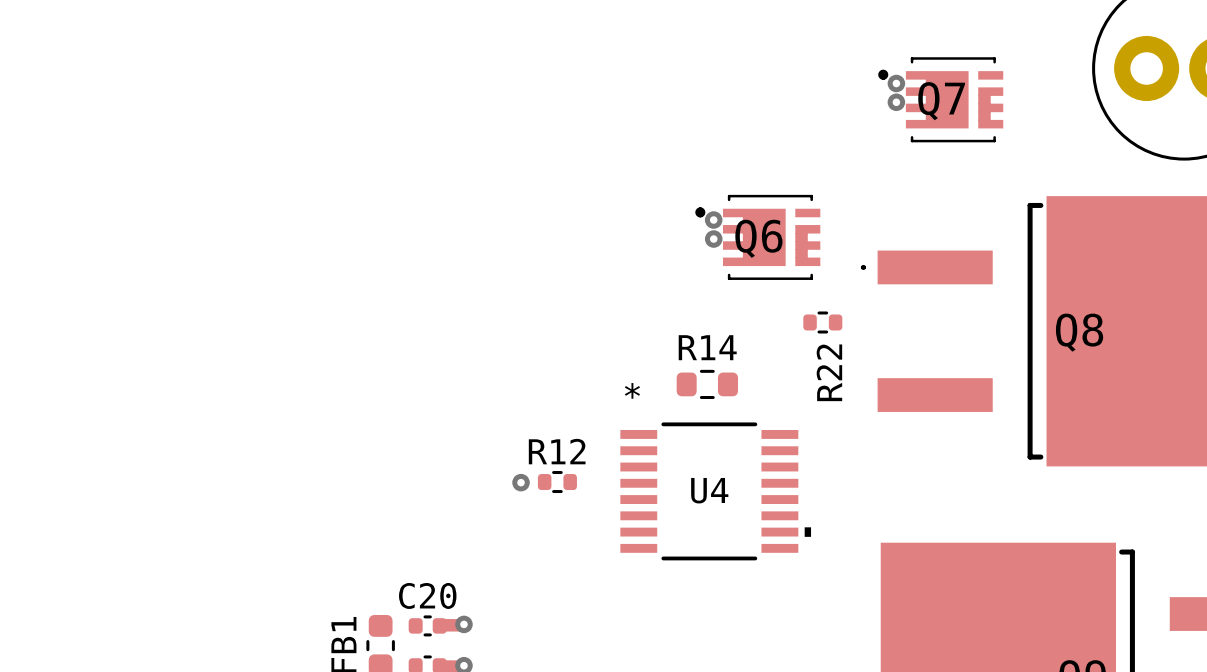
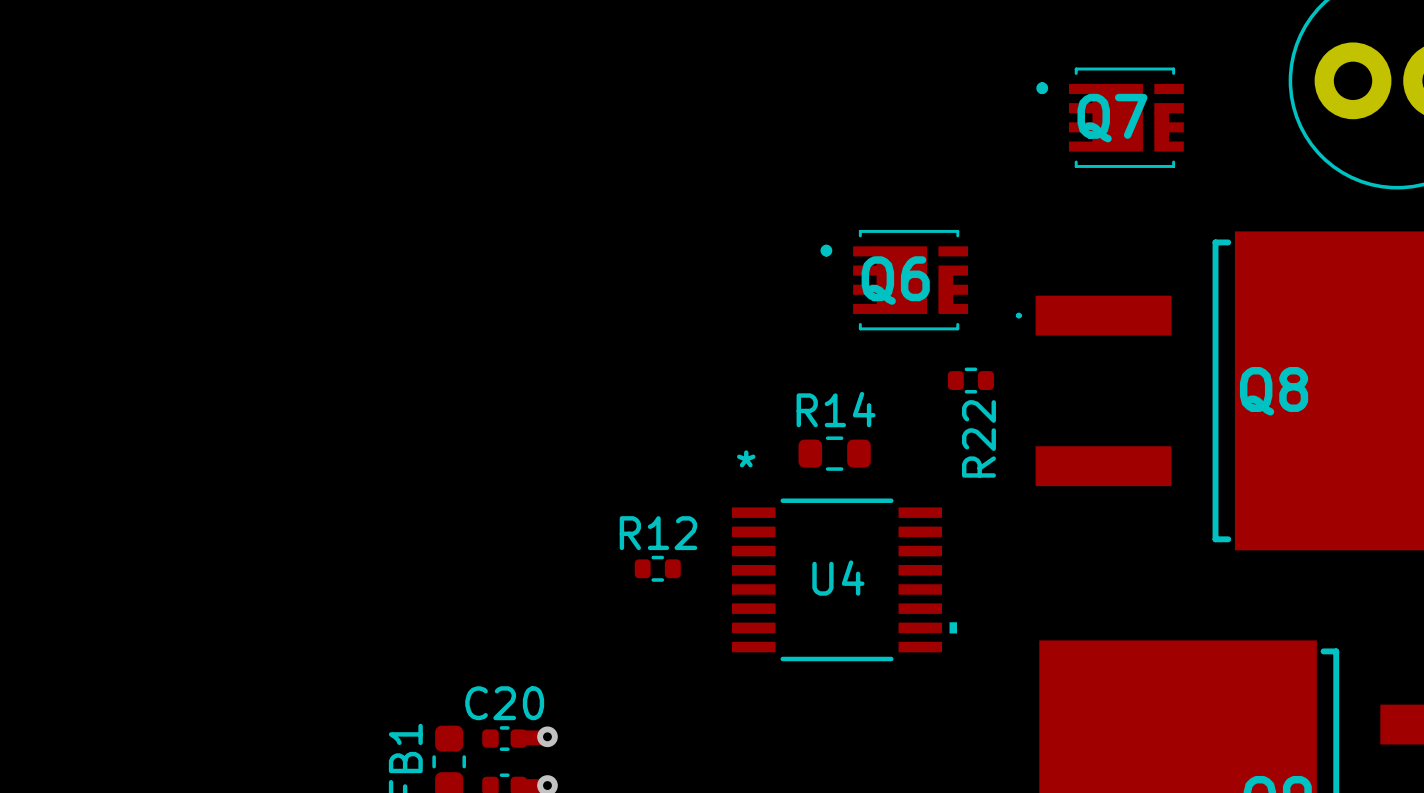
via: (896, 83) -> none
via: (896, 102) -> none
via: (713, 220) -> none
via: (713, 239) -> none
via: (521, 482) -> none

